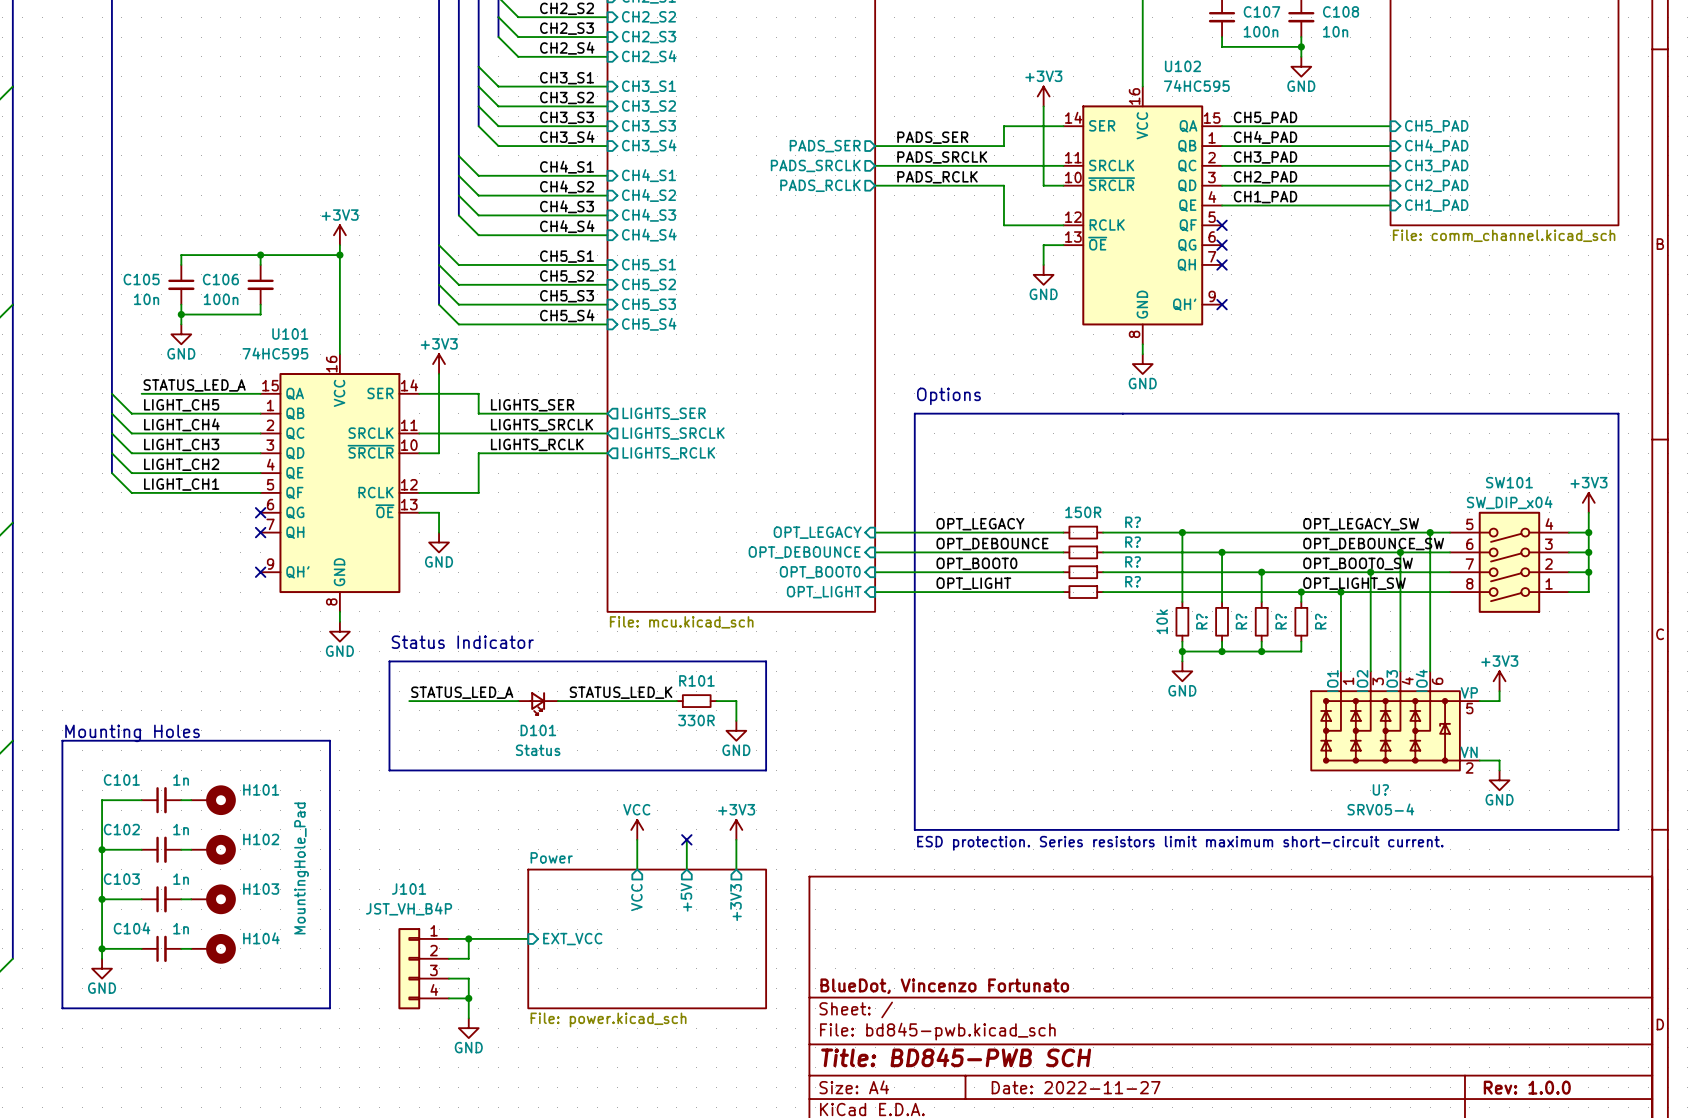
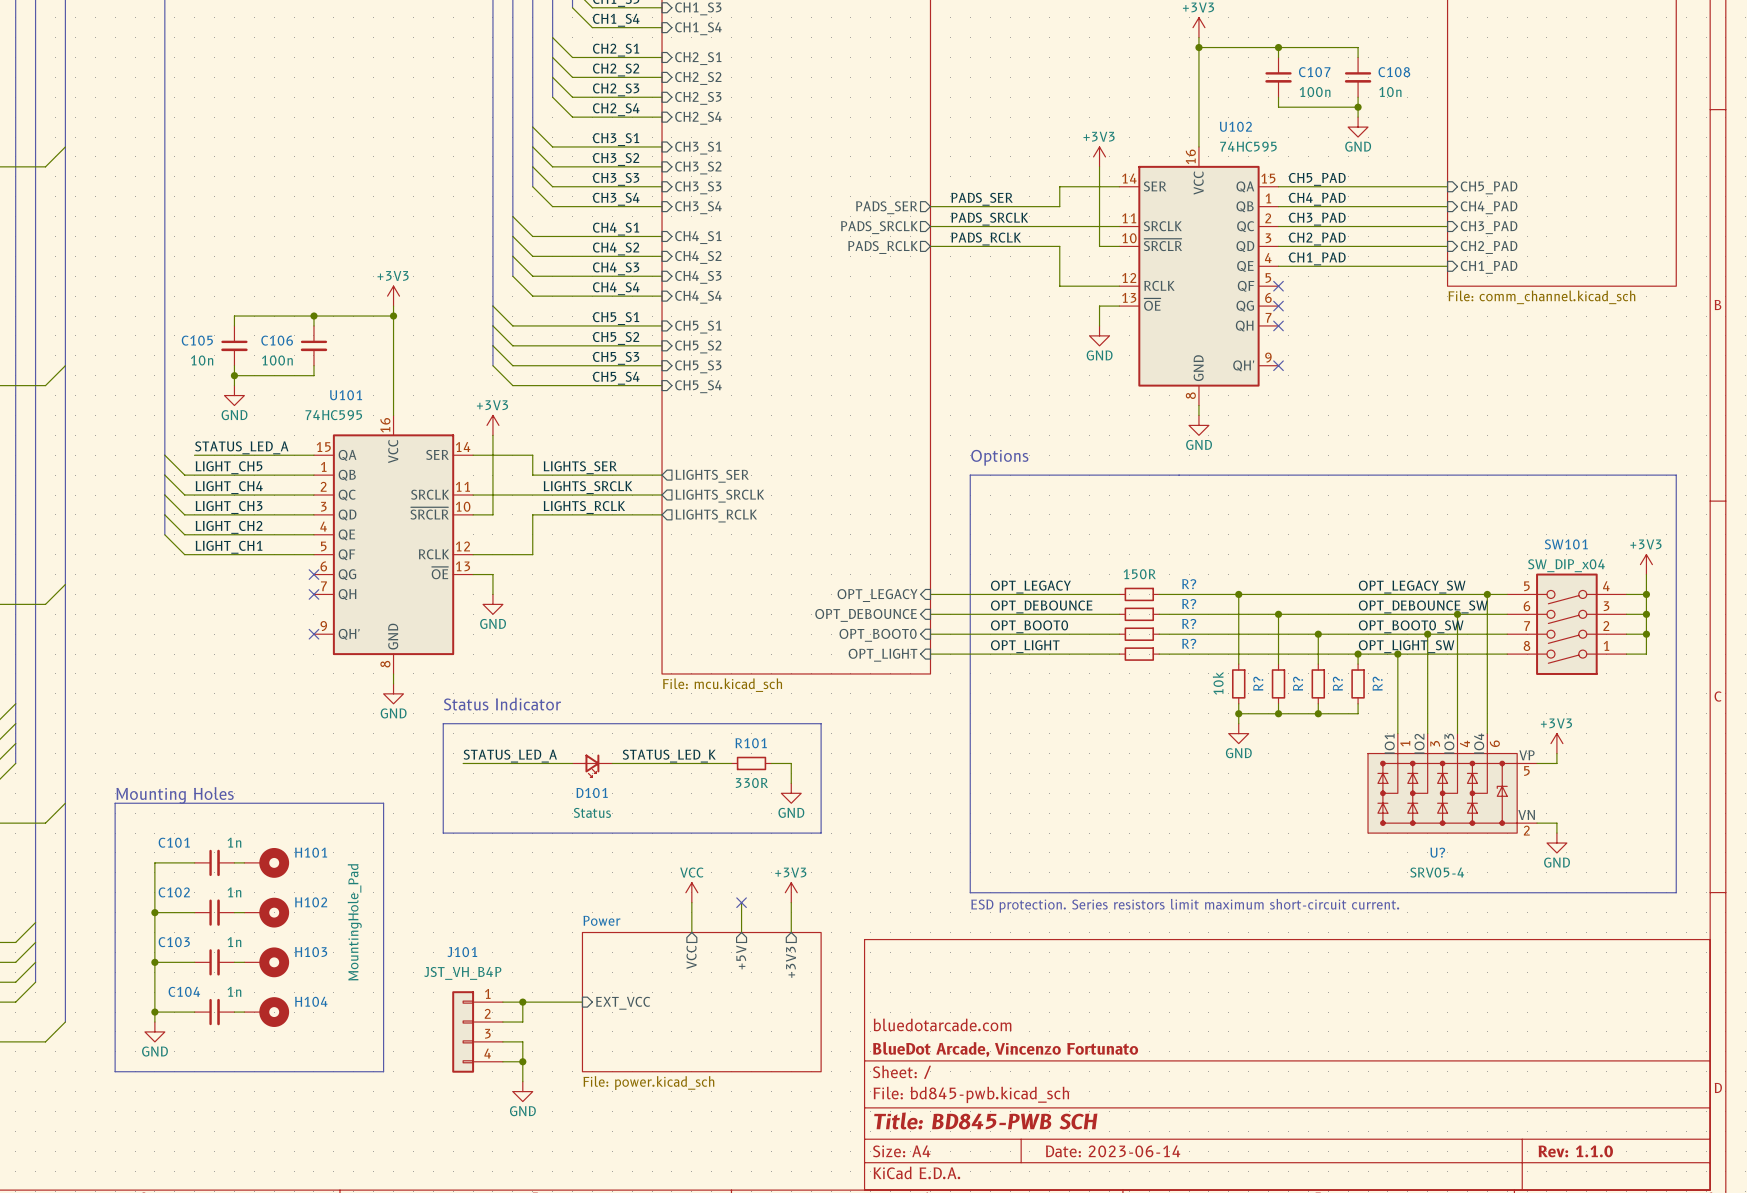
title block: none -> bluedotarcade.com (942, 1024)
title block: BlueDot, Vincenzo Fortunato (944, 986) -> BlueDot Arcade, Vincenzo Fortunato (1005, 1049)
title block: Date: 2022-11-27 (1076, 1087) -> Date: 2023-06-14 (1113, 1151)
title block: Rev: 1.0.0 (1527, 1087) -> Rev: 1.1.0 (1575, 1151)

